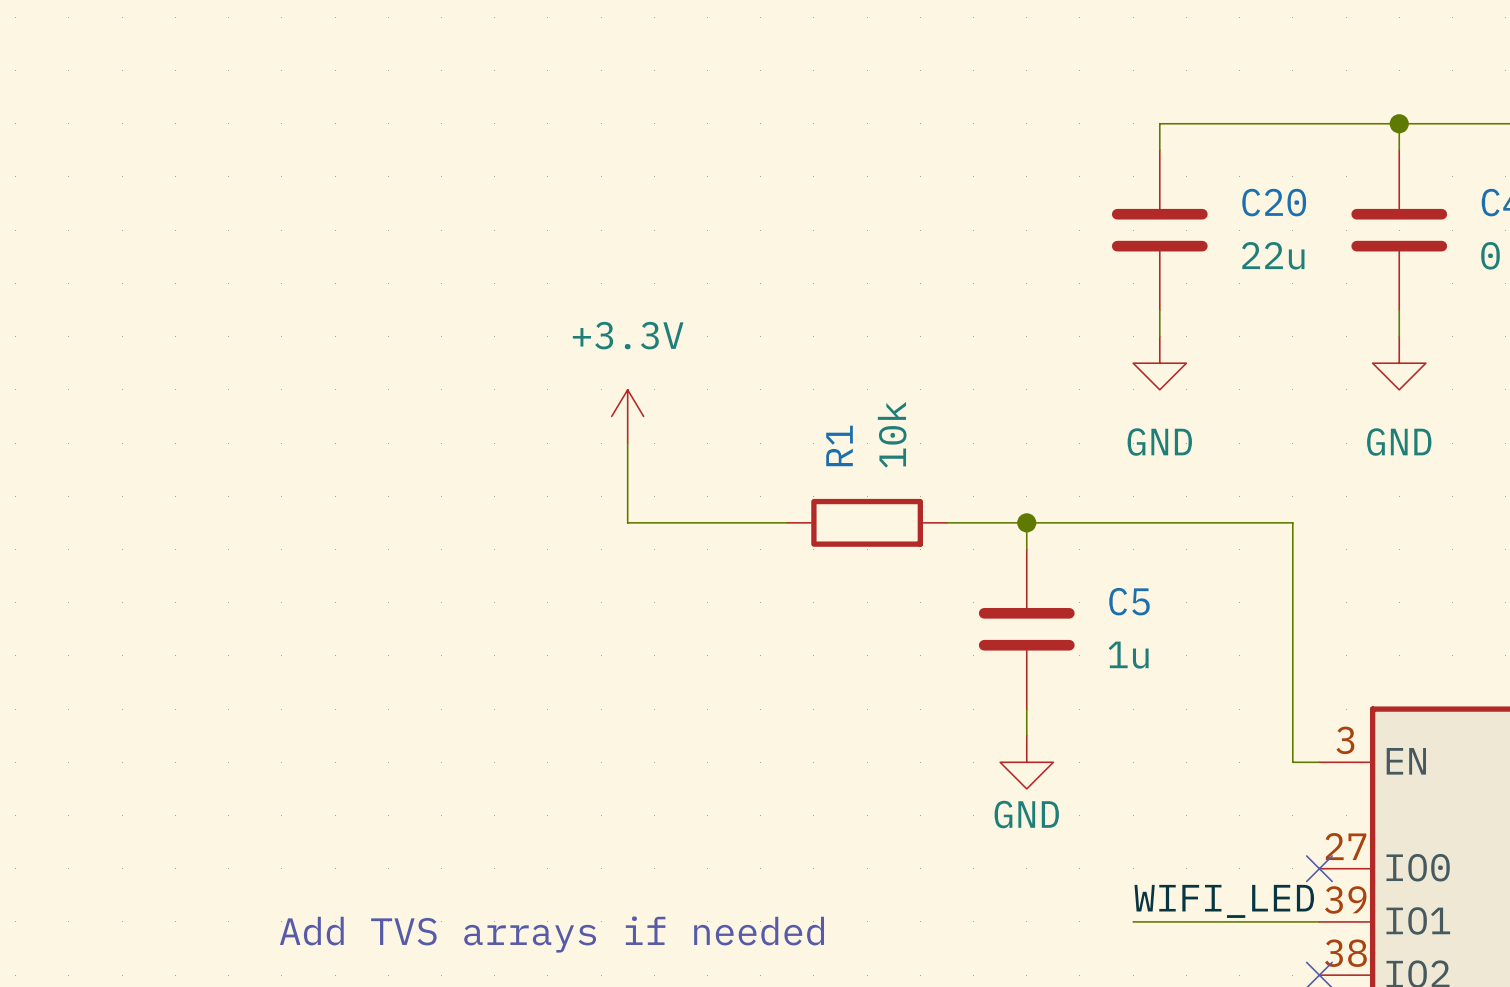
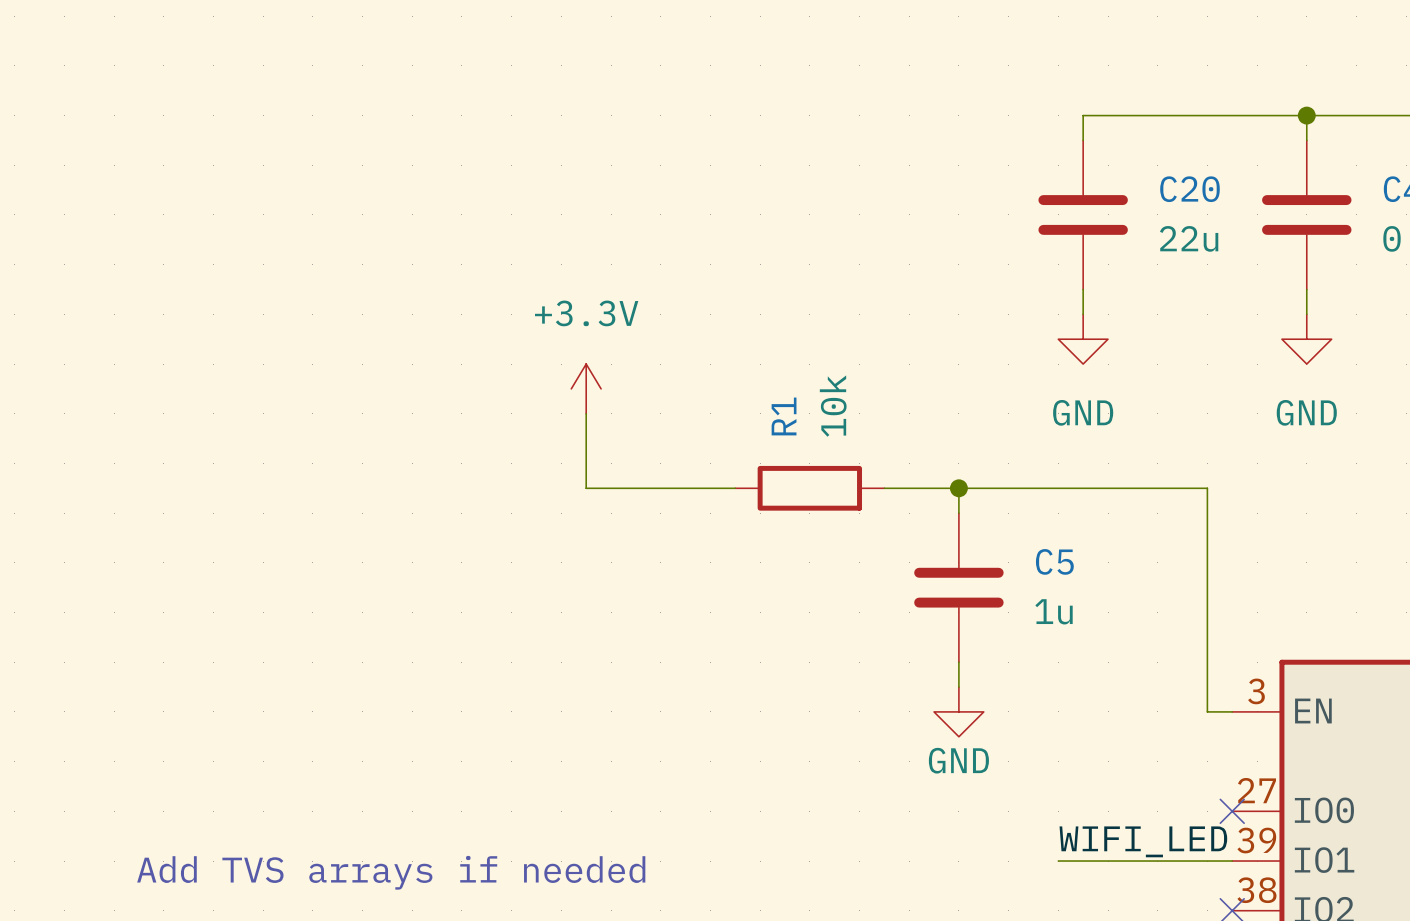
text position: Add TVS arrays if needed (551, 934) -> Add TVS arrays if needed (391, 872)

